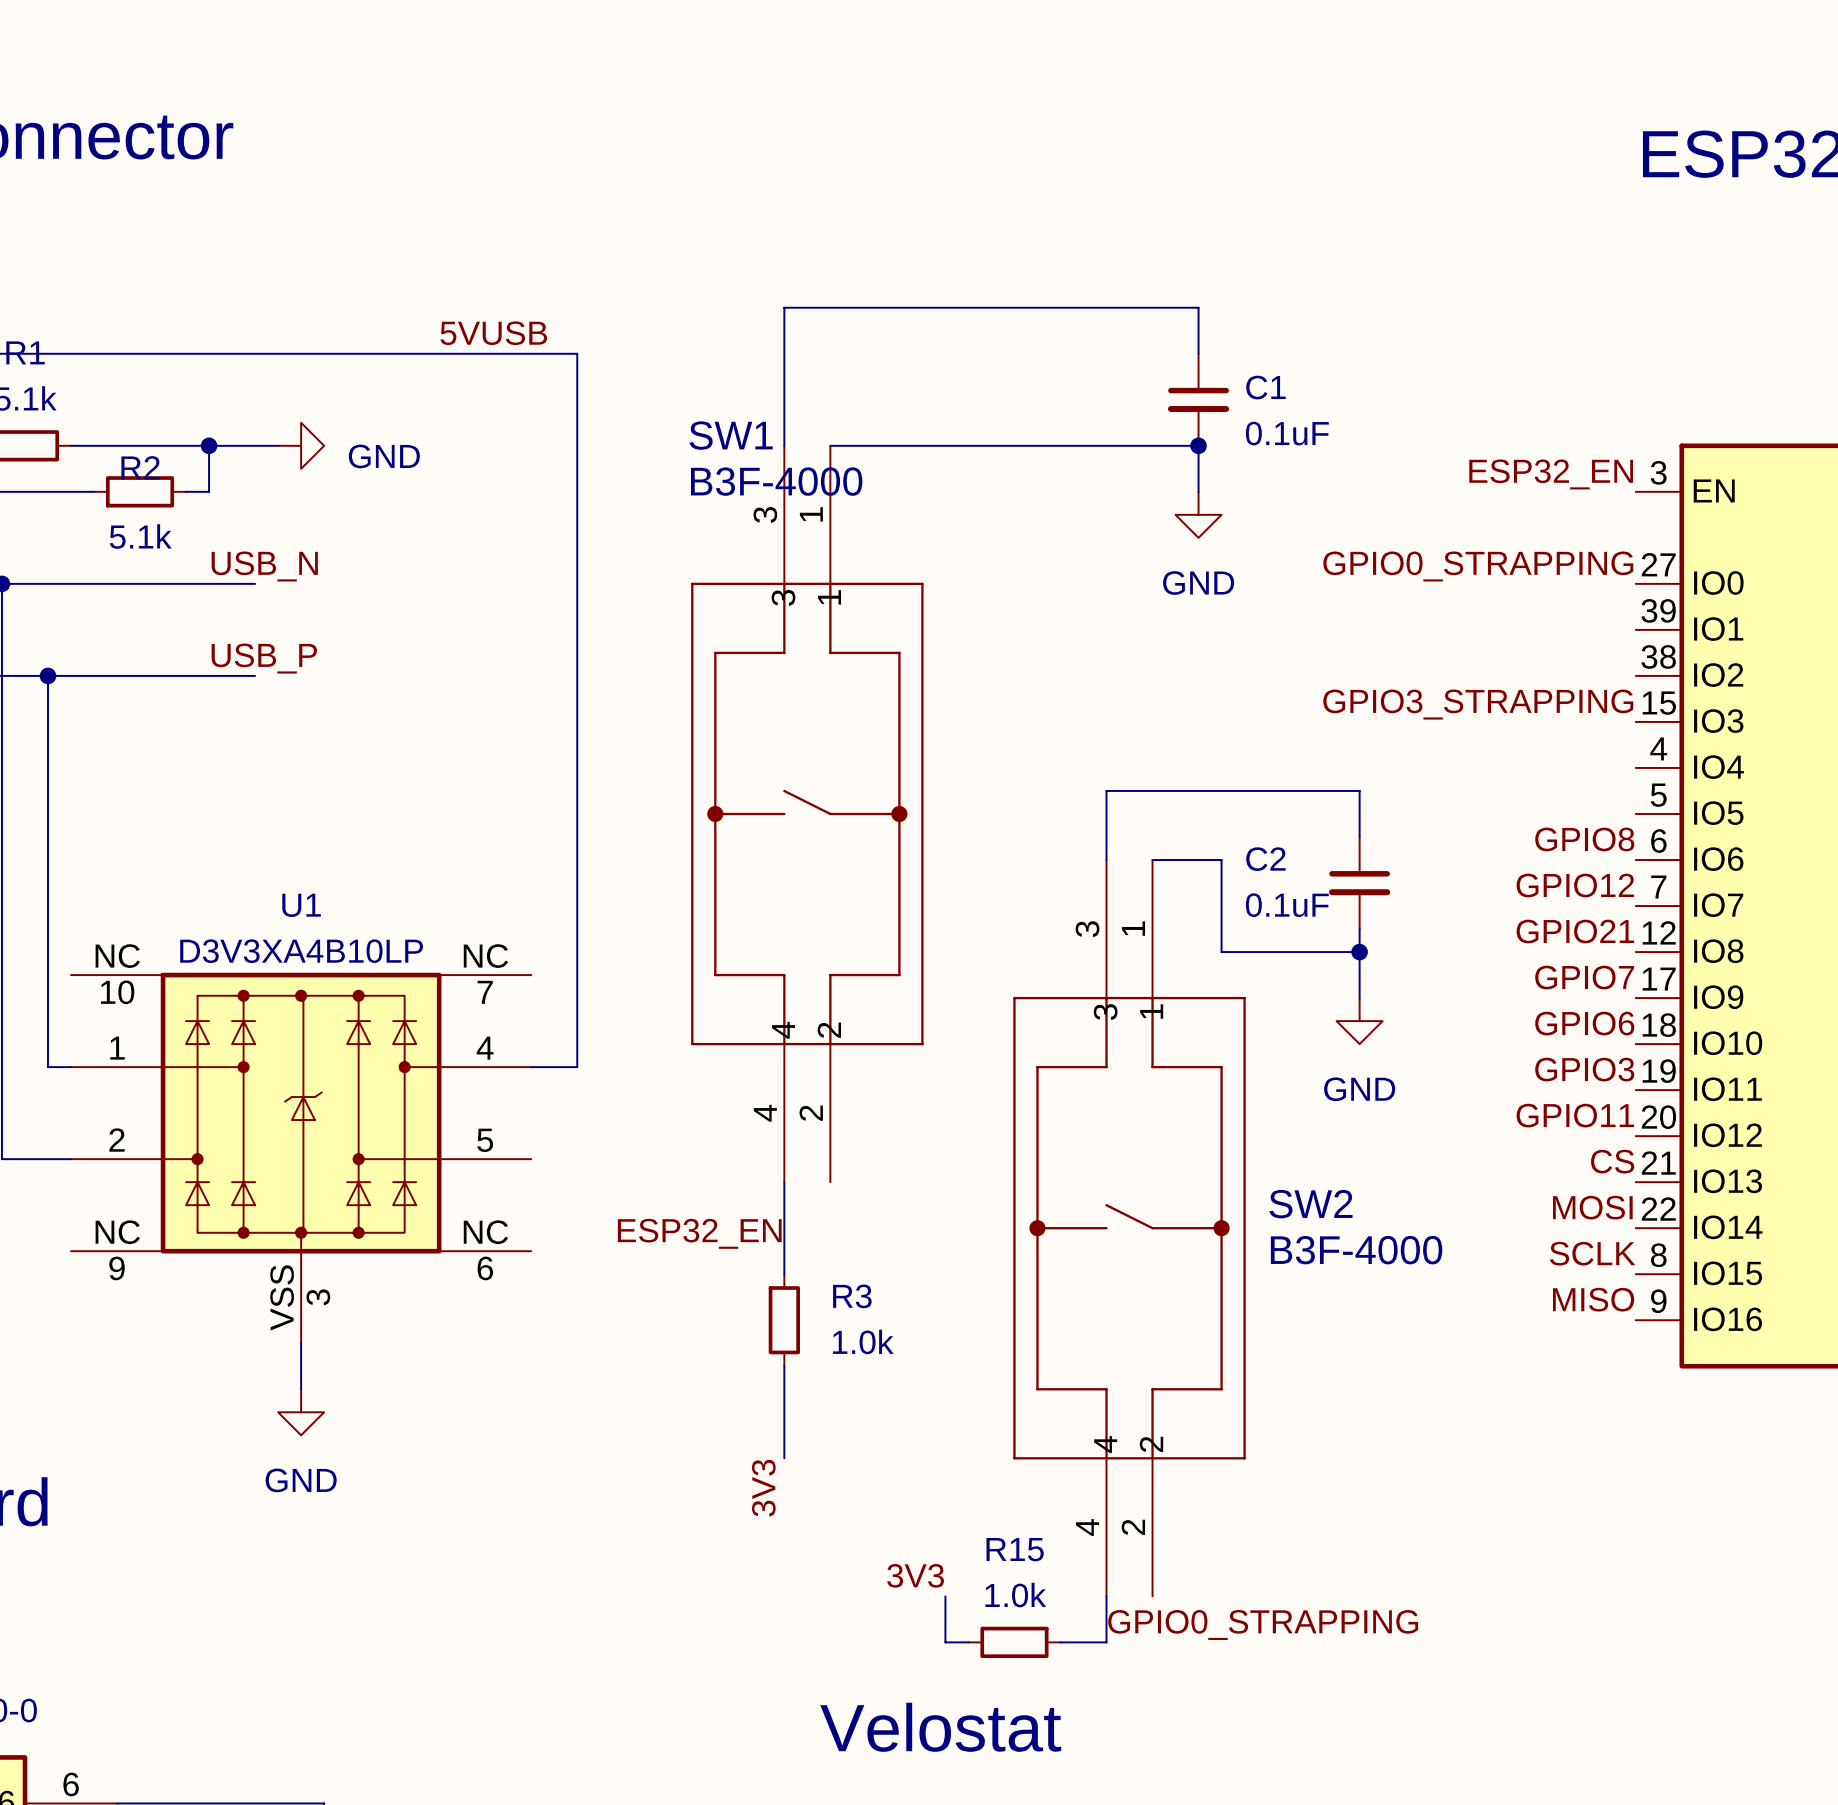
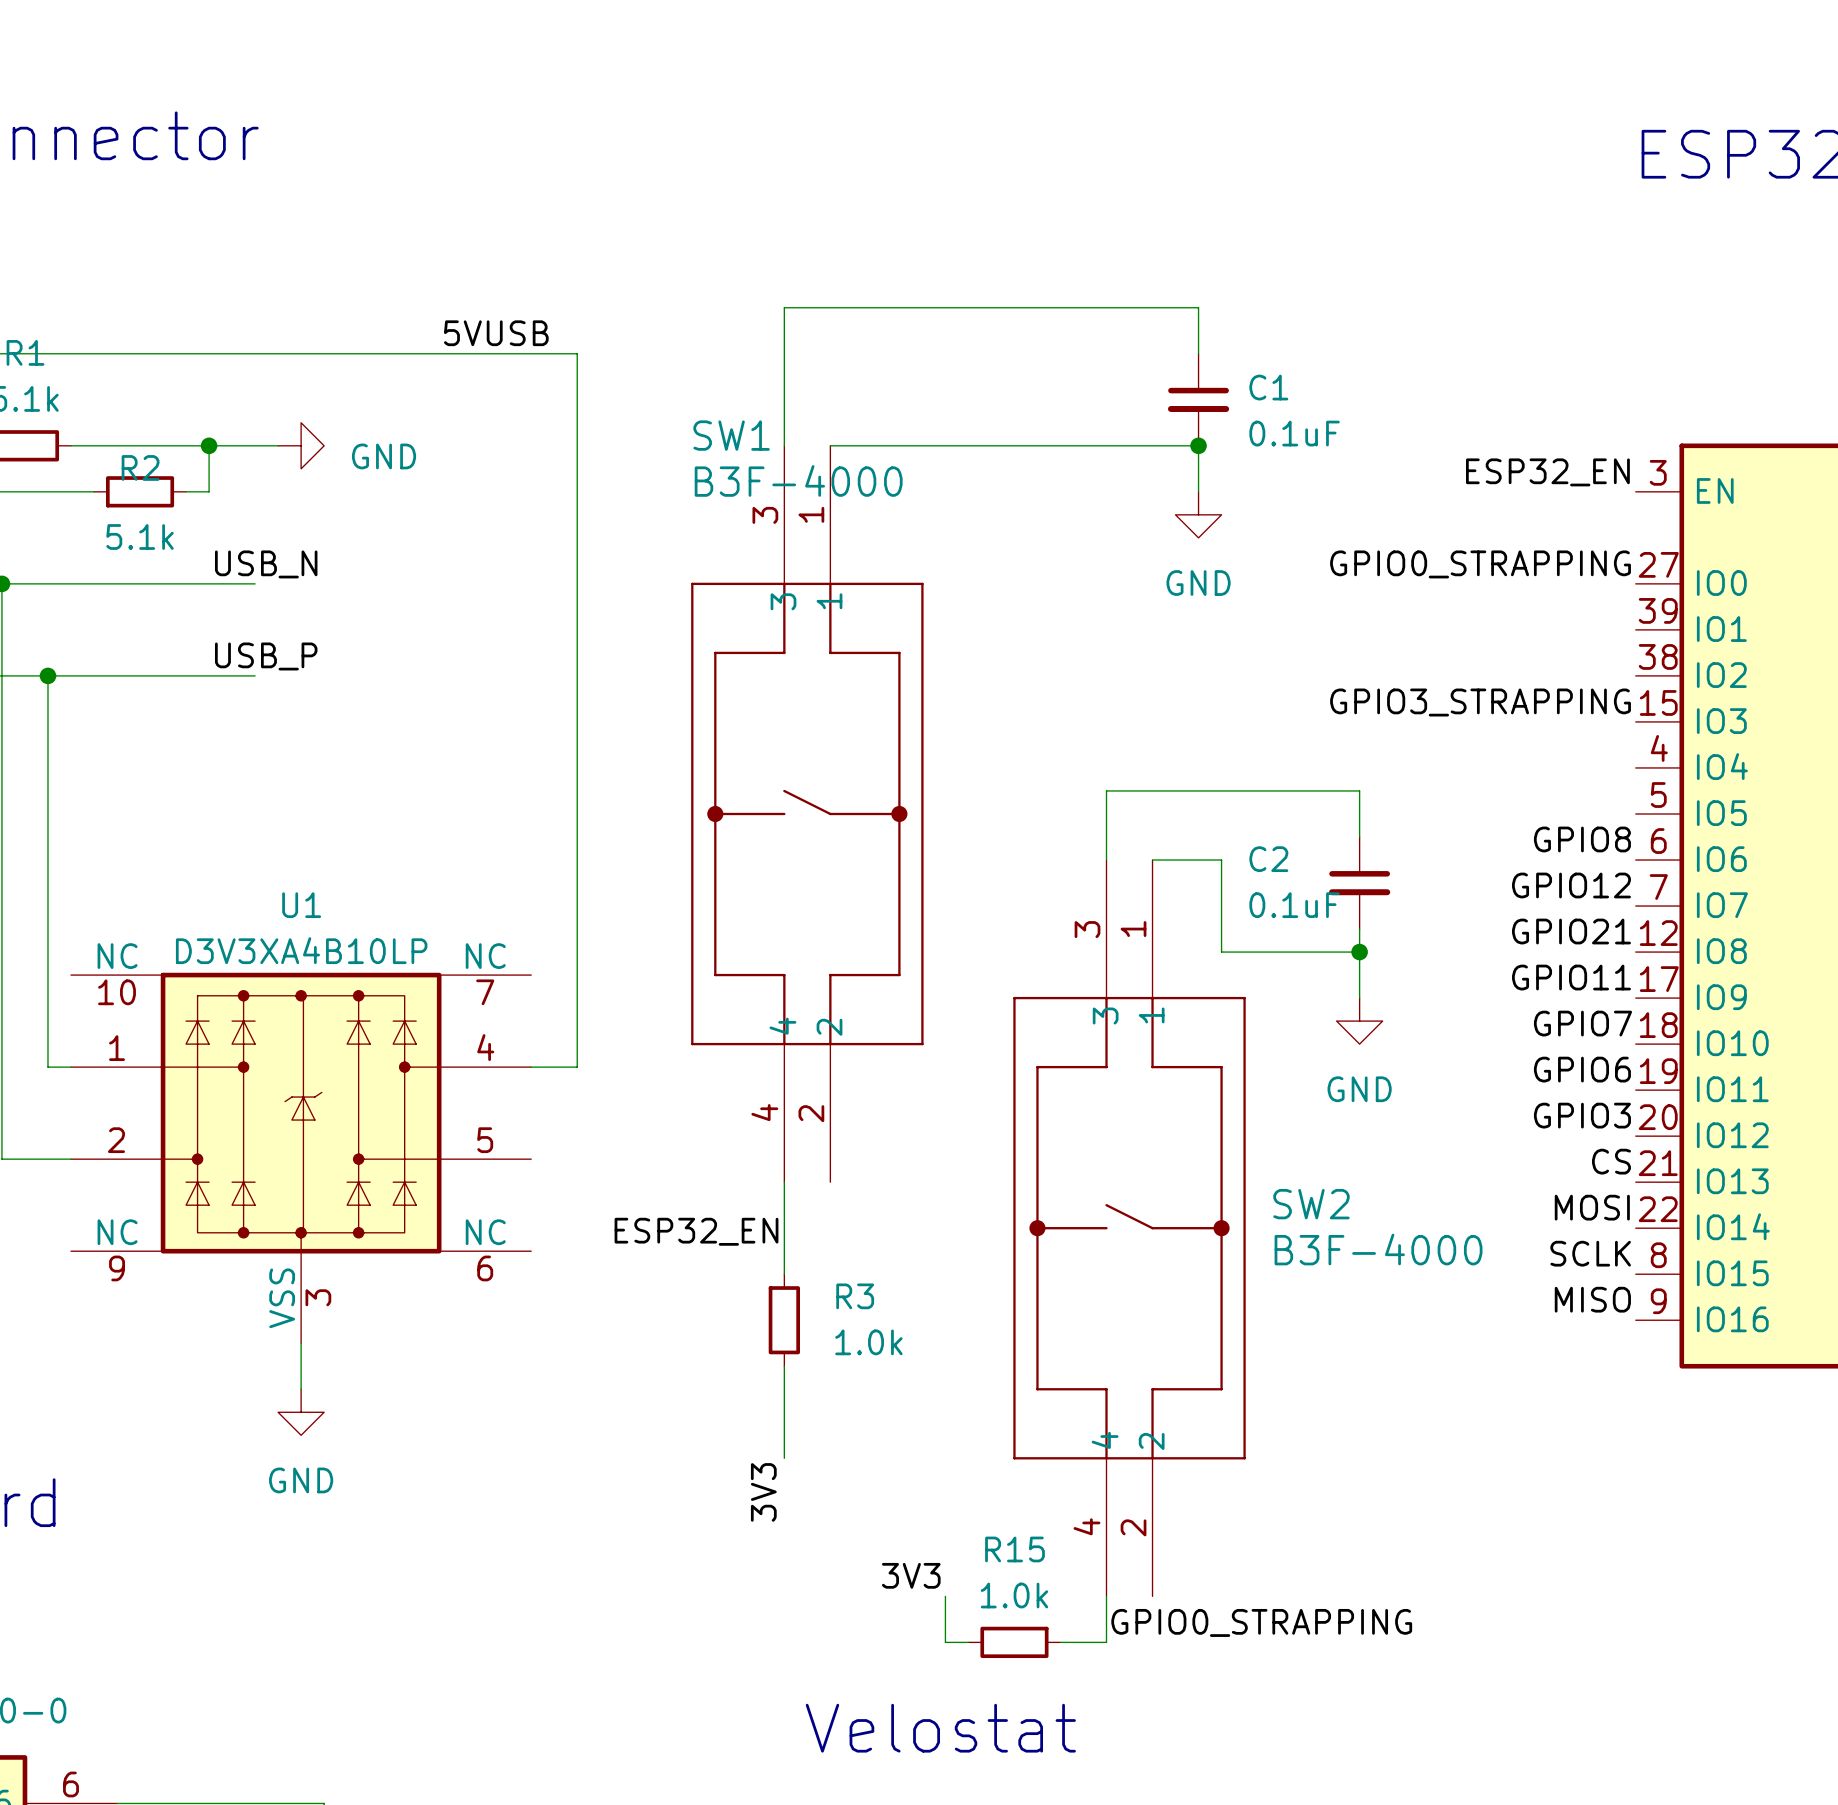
label: GPIO7 (1584, 977) -> GPIO11 (1571, 977)
label: GPIO6 (1584, 1023) -> GPIO7 (1582, 1023)
label: GPIO3 (1584, 1069) -> GPIO6 (1582, 1069)
label: GPIO11 (1575, 1115) -> GPIO3 (1582, 1115)

